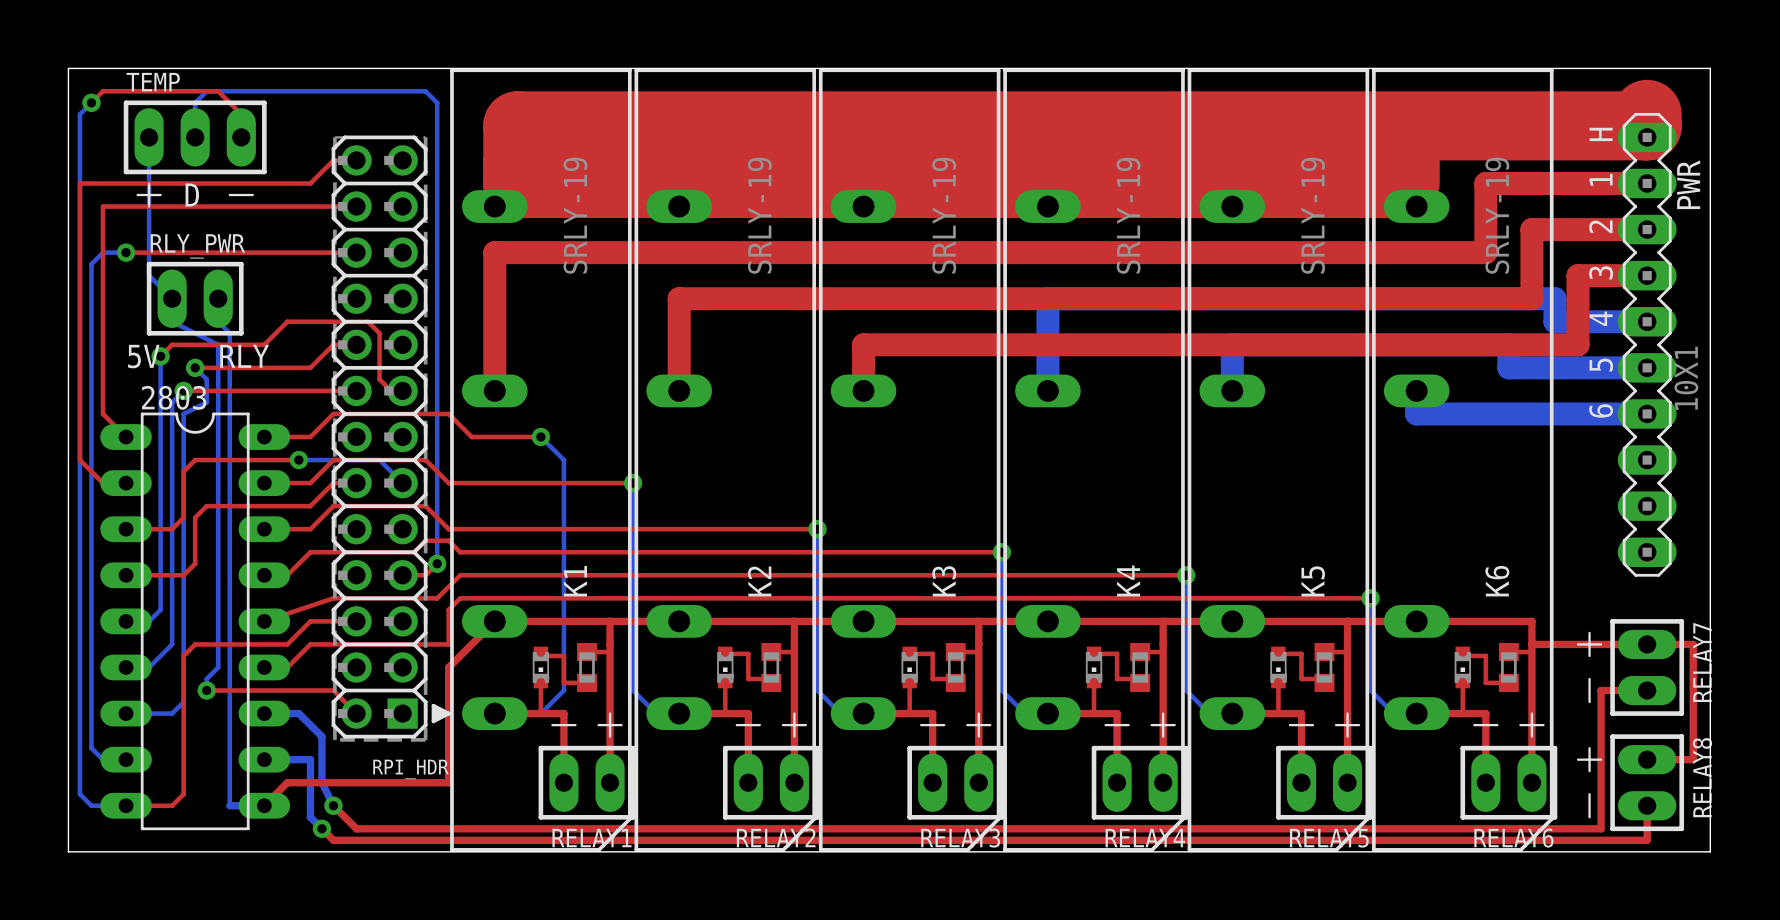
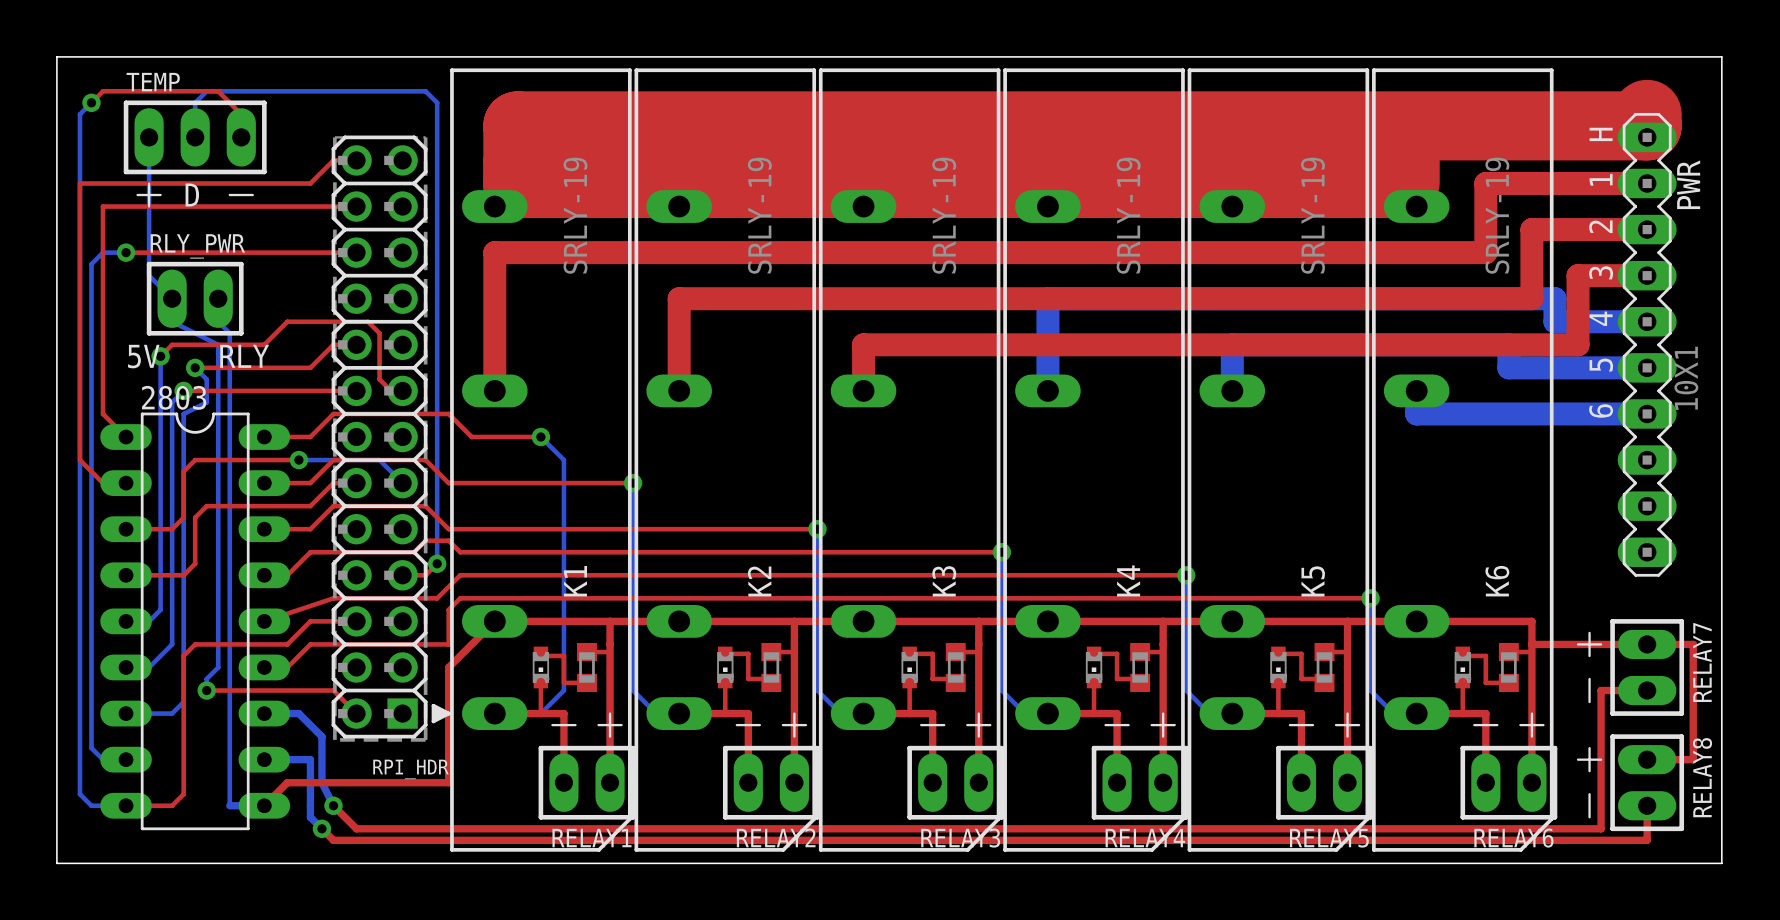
board edge: (68, 68) (1710, 68) (1710, 851) (68, 851) (68, 68) -> (56, 56) (56, 863) (1721, 863) (1721, 56) (56, 56)

